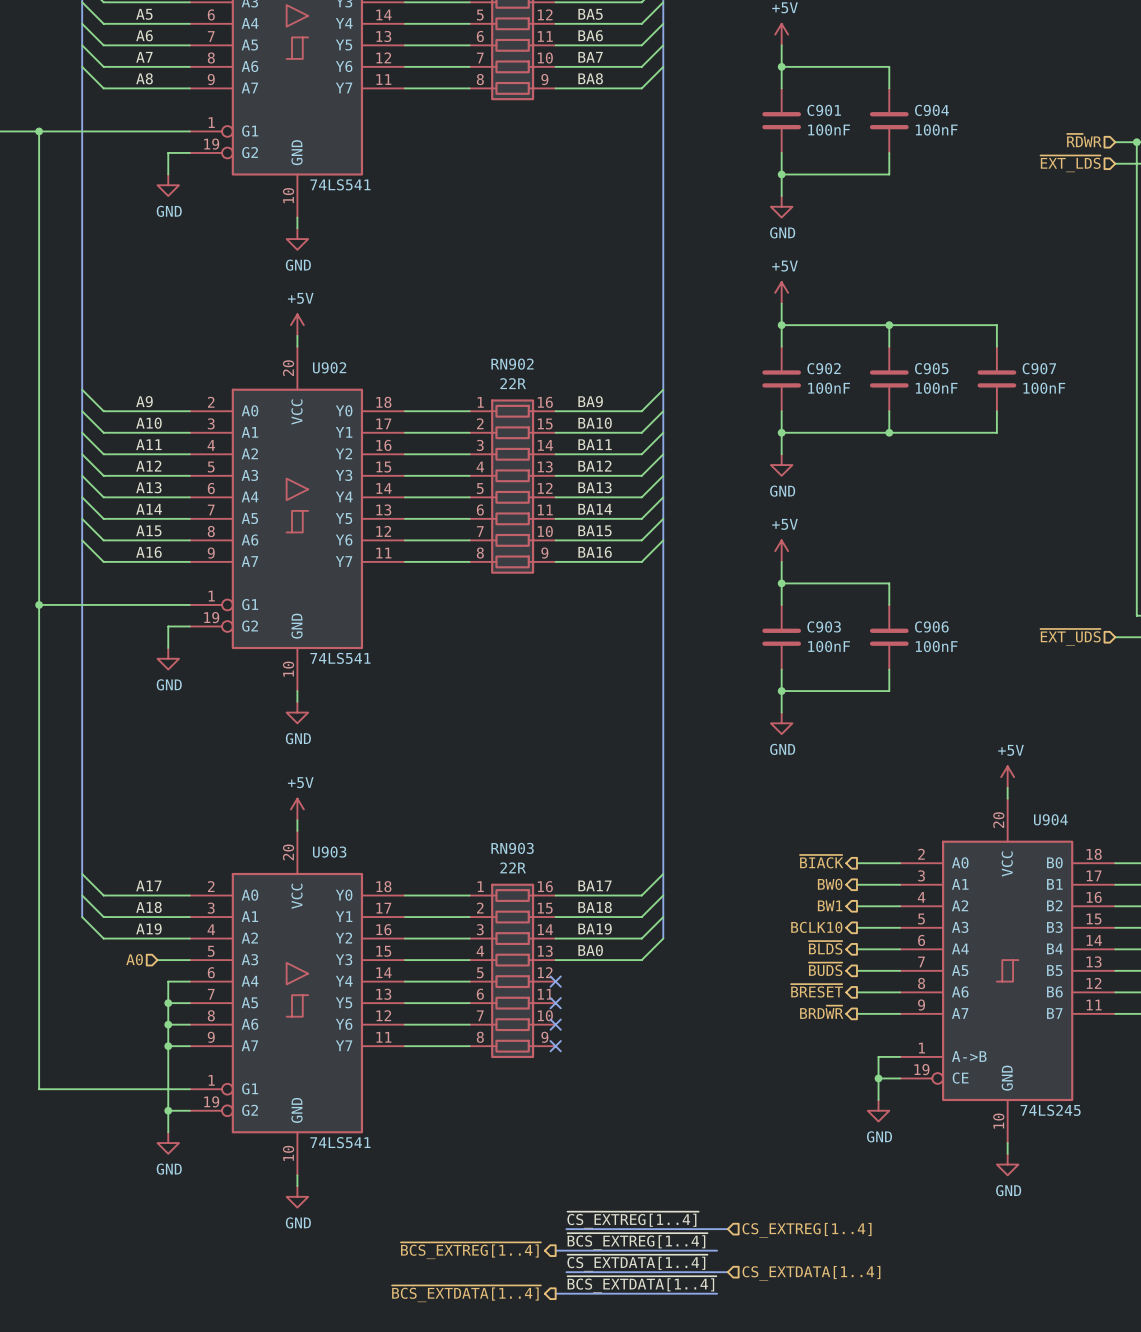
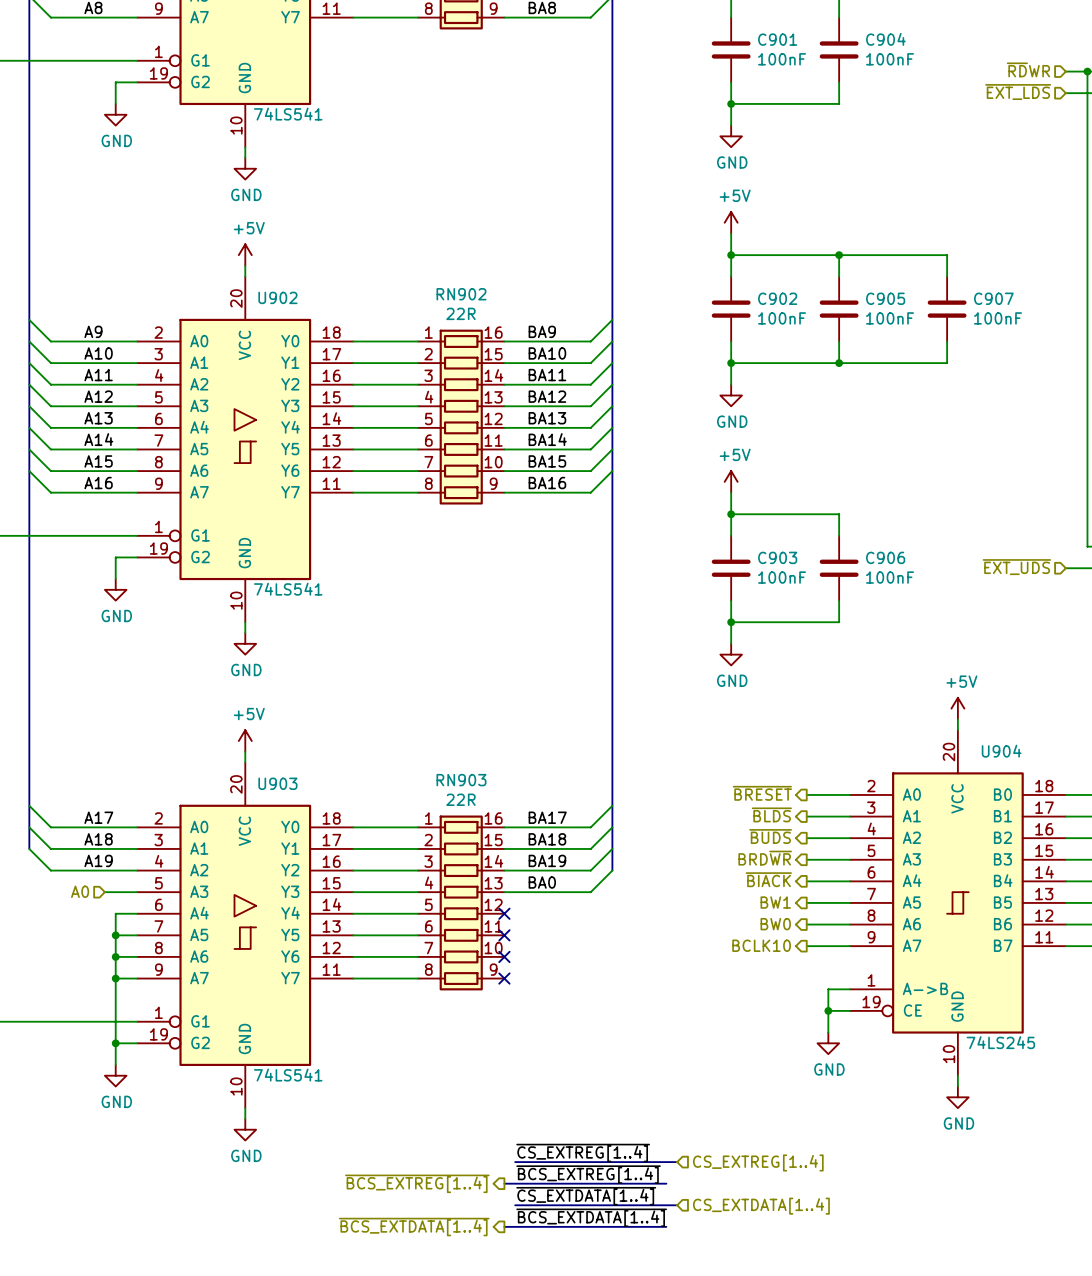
hierarchical label: ~{BIACK} (821, 861) -> ~{BRESET} (762, 793)
hierarchical label: BW0 (830, 884) -> ~{BLDS} (771, 814)
hierarchical label: BW1 (830, 905) -> ~{BUDS} (770, 836)
hierarchical label: BCLK10 (816, 927) -> BRD~{WR} (765, 858)
hierarchical label: ~{BLDS} (825, 947) -> ~{BIACK} (768, 879)
hierarchical label: ~{BUDS} (825, 969) -> BW1 (775, 902)
hierarchical label: ~{BRESET} (817, 990) -> BW0 (775, 924)
hierarchical label: BRD~{WR} (821, 1012) -> BCLK10 (761, 945)

